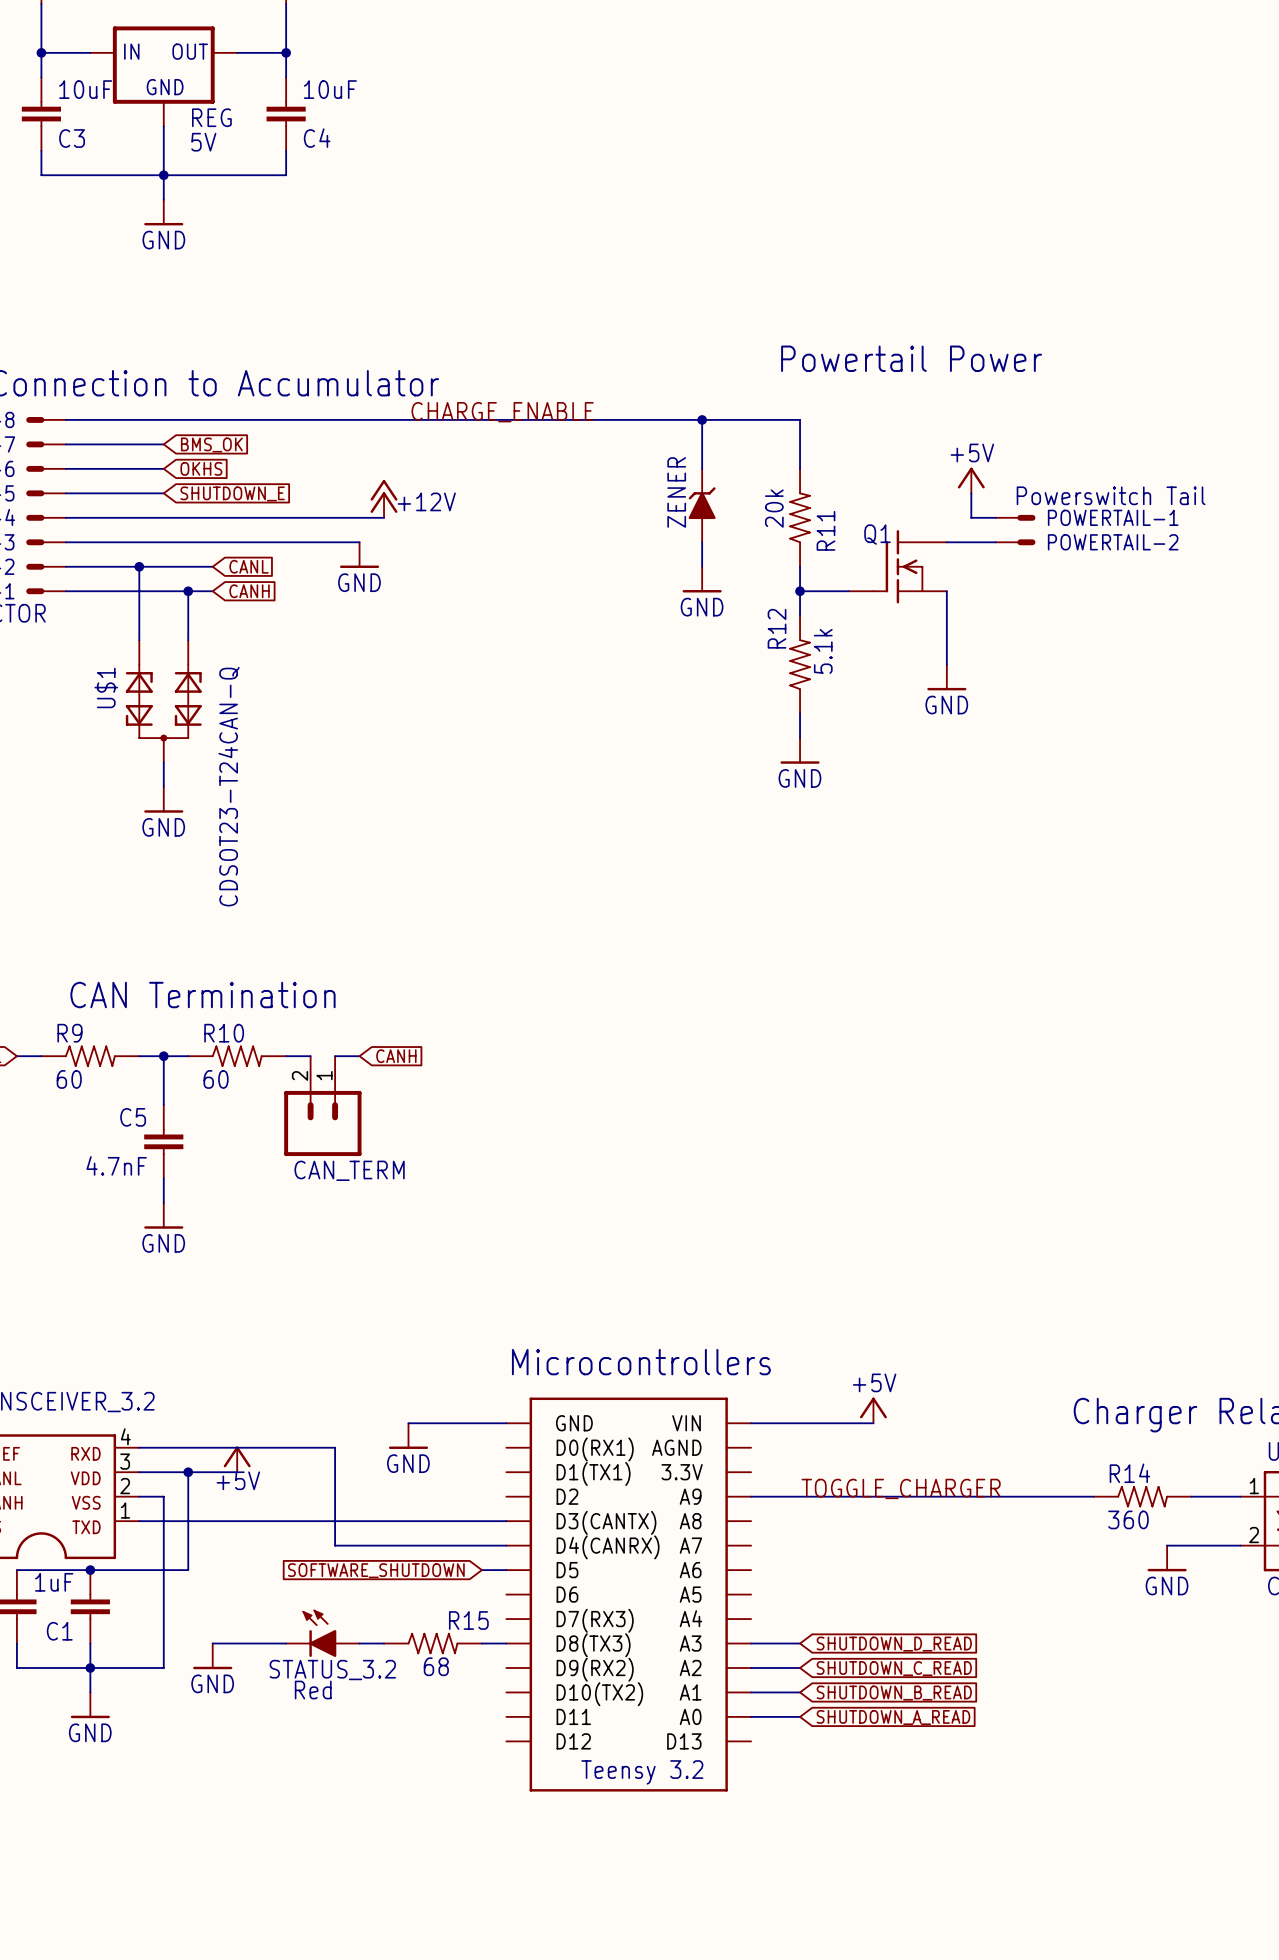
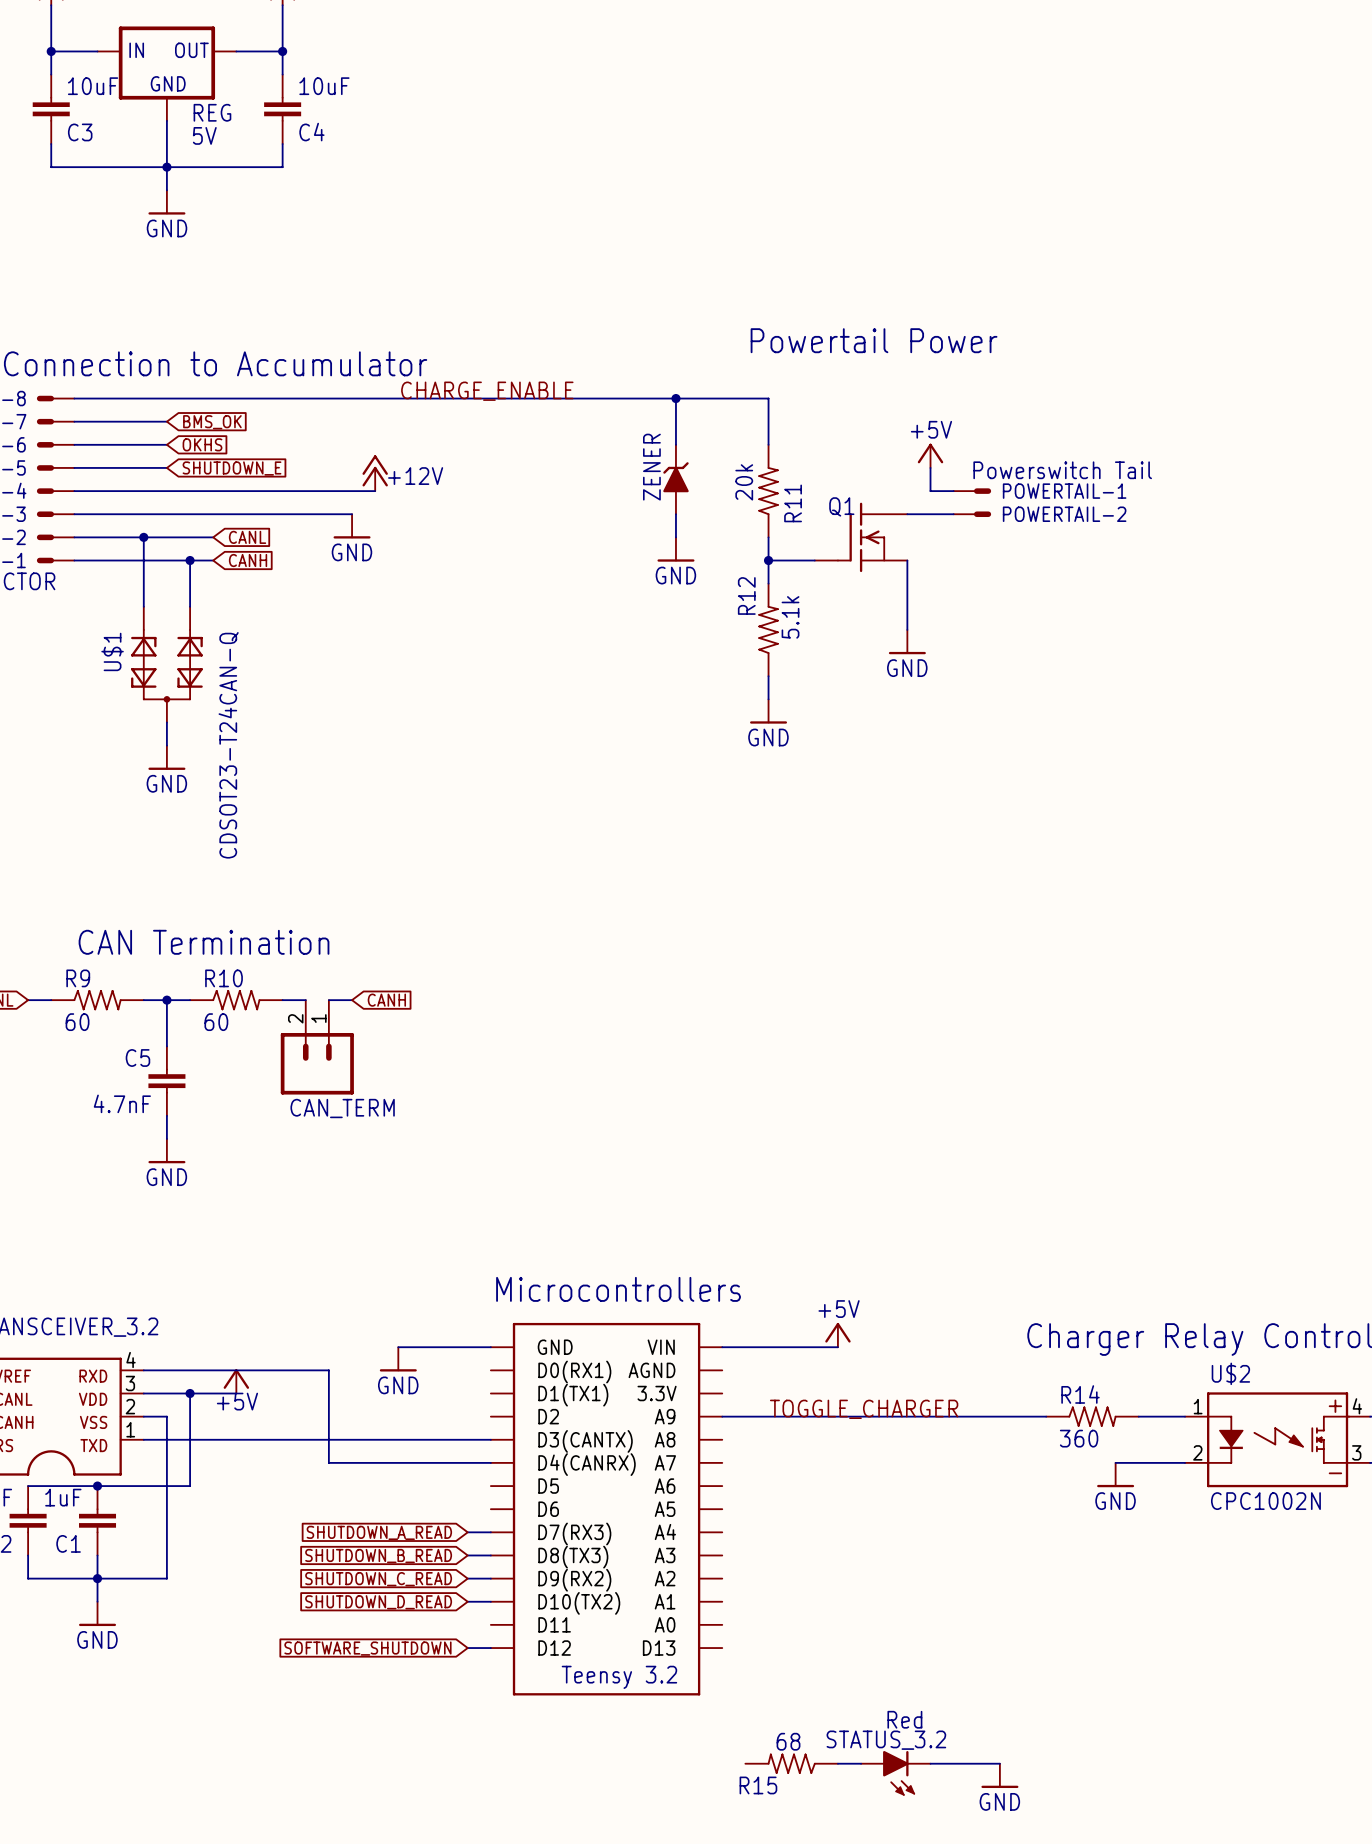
global label position: SOFTWARE_SHUTDOWN (376, 1570) -> SOFTWARE_SHUTDOWN (367, 1648)
wire: (481, 1570) (506, 1570) -> (467, 1532) (490, 1532)
global label: none -> SHUTDOWN_A_READ (379, 1532)
STATUS_3.2 rotation: 0° (319, 1633) -> 180° (899, 1773)
STATUS_3.2 position: (322, 1633) -> (895, 1773)
wire: (212, 1643) (286, 1643) -> none
wire: (359, 1643) (384, 1643) -> (467, 1578) (490, 1578)
R15 rotation: 0° (432, 1643) -> 180° (791, 1763)
R15 position: (432, 1643) -> (791, 1763)
wire: (751, 1643) (800, 1643) -> none
global label: none -> SHUTDOWN_B_READ (378, 1556)
global label: SHUTDOWN_D_READ (894, 1644) -> none
power symbol: GND (212, 1656) -> none
wire: (751, 1667) (800, 1667) -> none
global label: none -> SHUTDOWN_C_READ (378, 1579)
global label: SHUTDOWN_C_READ (894, 1668) -> none
wire: none -> (467, 1601) (490, 1601)
wire: (751, 1692) (800, 1692) -> none
global label: none -> SHUTDOWN_D_READ (378, 1602)
global label: SHUTDOWN_B_READ (894, 1693) -> none
wire: (751, 1716) (800, 1716) -> none
global label: SHUTDOWN_A_READ (893, 1717) -> none
wire: none -> (467, 1648) (490, 1648)
wire: none -> (837, 1763) (861, 1763)
wire: none -> (930, 1763) (999, 1763)
power symbol: none -> GND (999, 1775)

